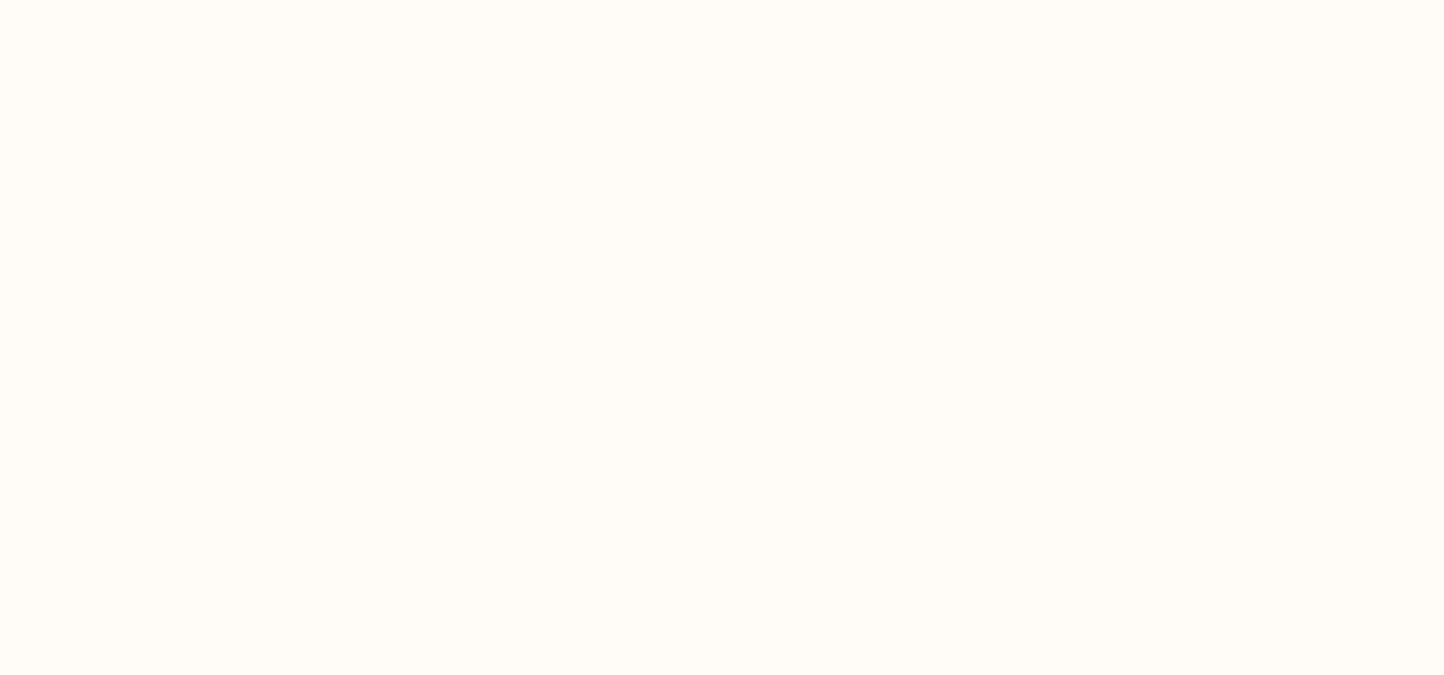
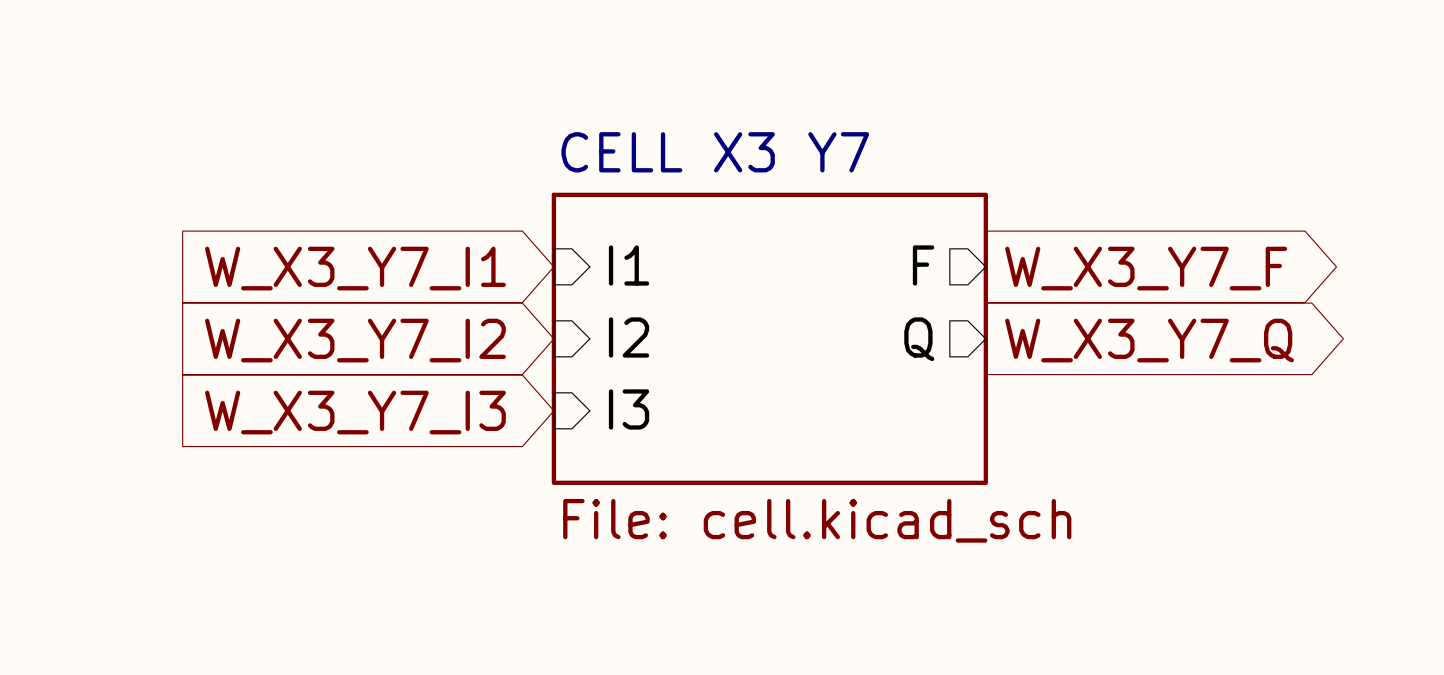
sheet pin: none -> I1 (629, 265)
sheet pin: none -> F (923, 265)
global label: none -> W_X3_Y7_I1 (355, 268)
global label: none -> W_X3_Y7_F (1146, 268)
sheet pin: none -> I2 (629, 337)
sheet CELL X3 Y7: none -> File: cell.kicad_sch (769, 338)
sheet pin: none -> Q (919, 339)
global label: none -> W_X3_Y7_I2 (355, 340)
global label: none -> W_X3_Y7_Q (1149, 340)
sheet pin: none -> I3 (629, 409)
global label: none -> W_X3_Y7_I3 (355, 412)

